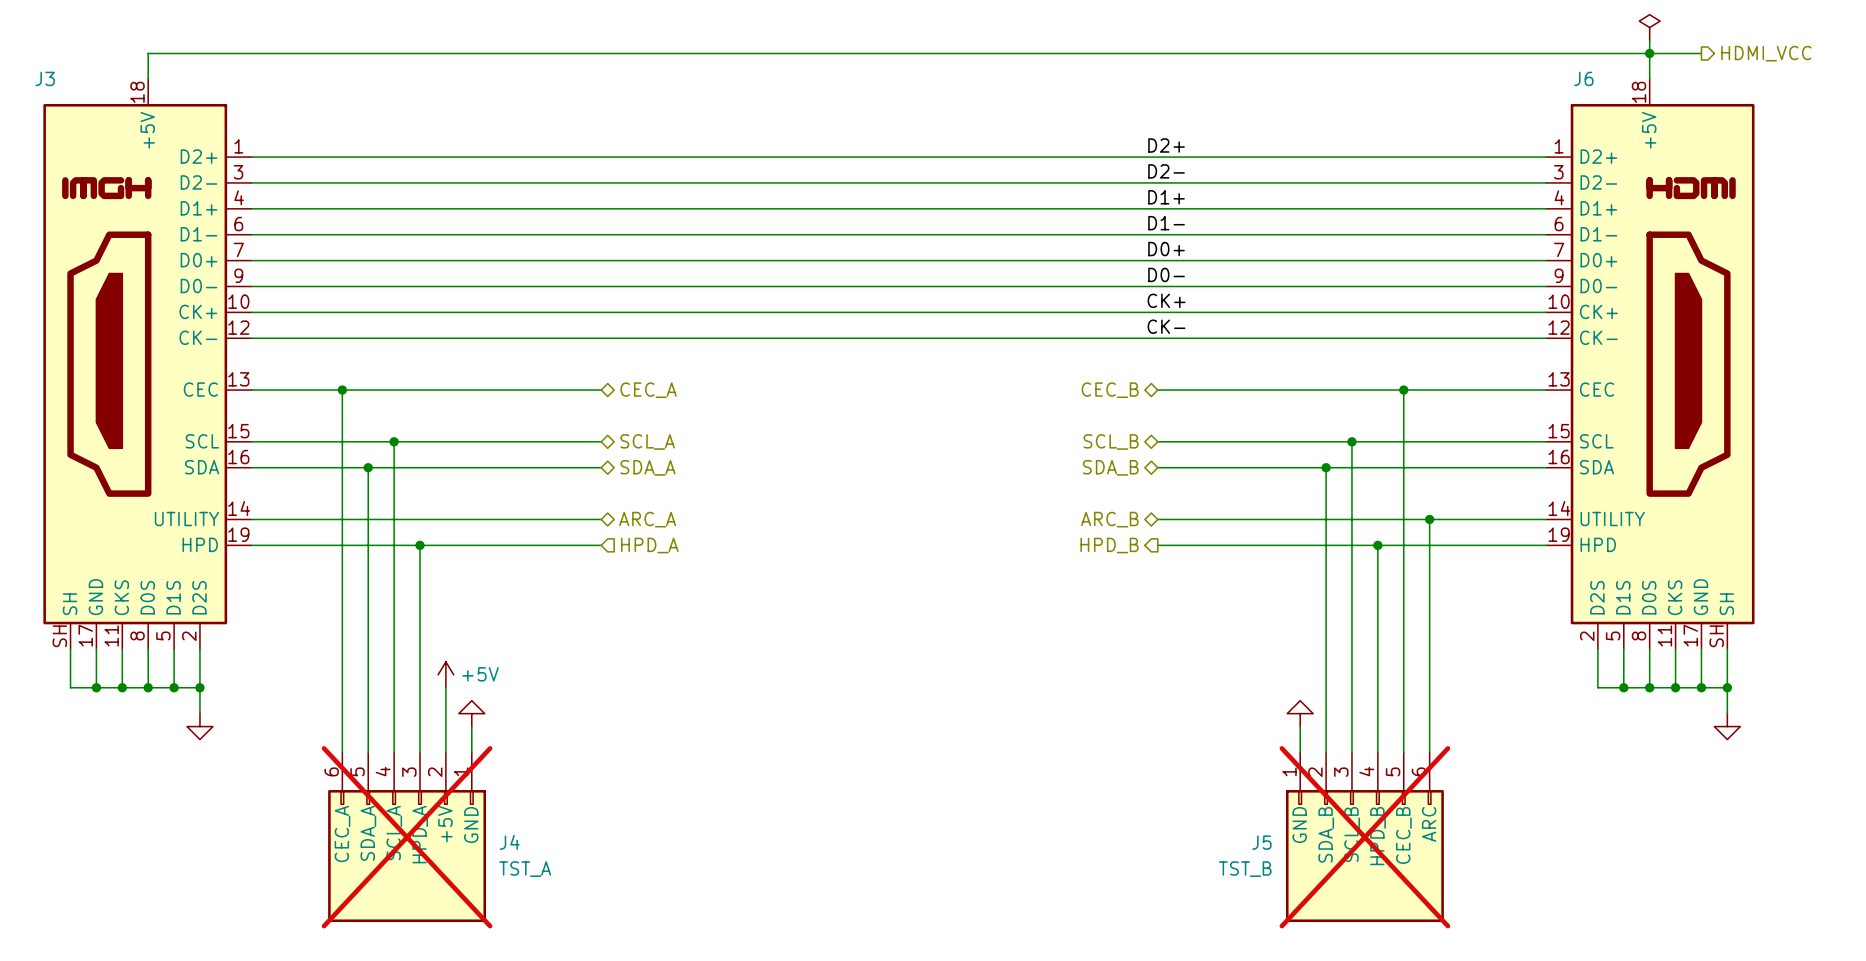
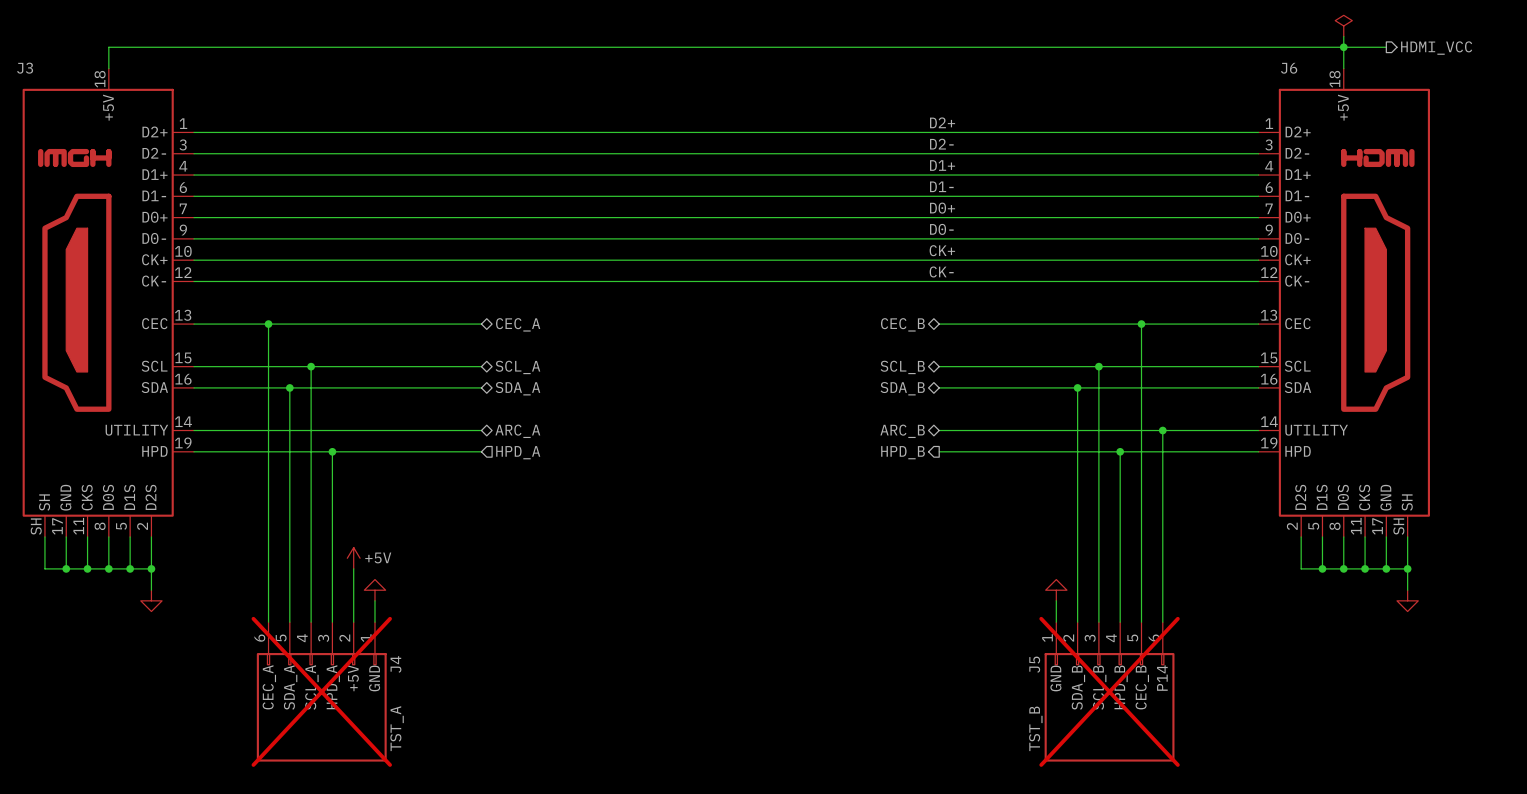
J5 text: ARC (1429, 824) -> P14 (1162, 678)
J4 name rotation: 0° (509, 842) -> 90° counterclockwise (395, 664)
J4 name position: J4 (509, 842) -> J4 (395, 664)
J5 name rotation: 0° (1261, 842) -> 90° counterclockwise (1034, 664)
J5 name position: J5 (1261, 842) -> J5 (1034, 664)
J4 text rotation: 0° (525, 869) -> 90° counterclockwise (397, 728)
J5 text rotation: 0° (1245, 869) -> 90° counterclockwise (1035, 728)

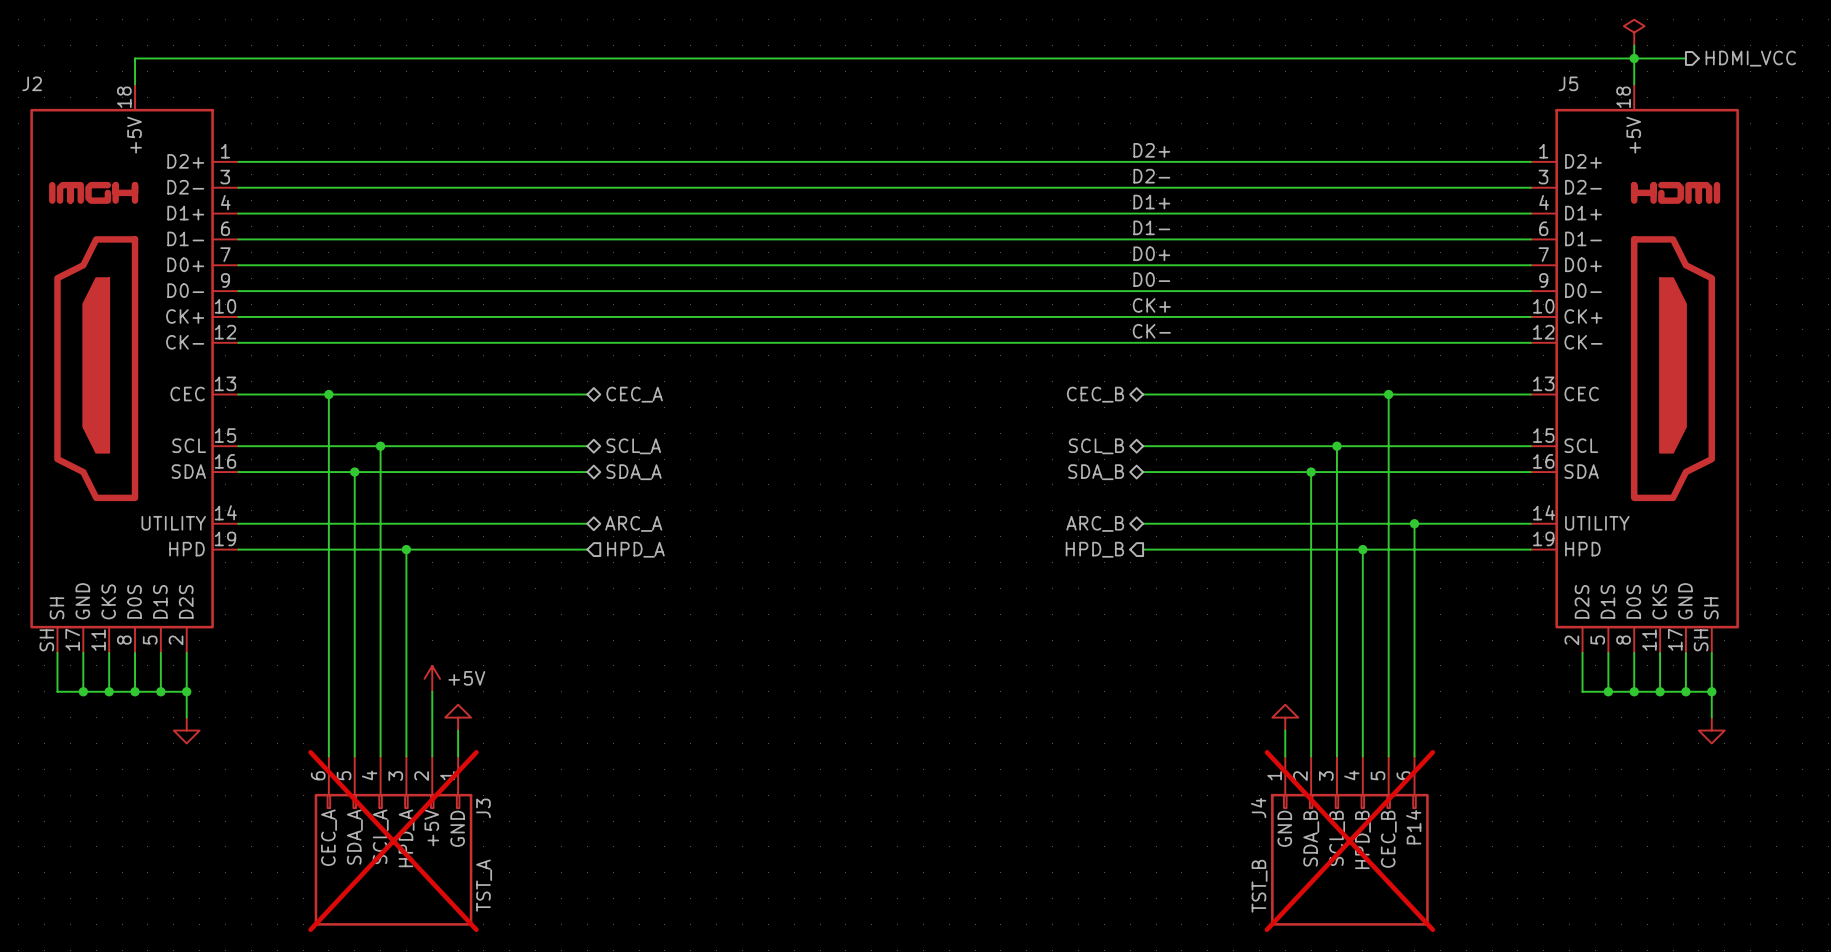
J3 name: J3 (25, 68) -> J2 (32, 83)
J6 name: J6 (1289, 68) -> J5 (1568, 83)
J4 name: J4 (395, 664) -> J3 (483, 808)
J5 name: J5 (1034, 664) -> J4 (1258, 808)

